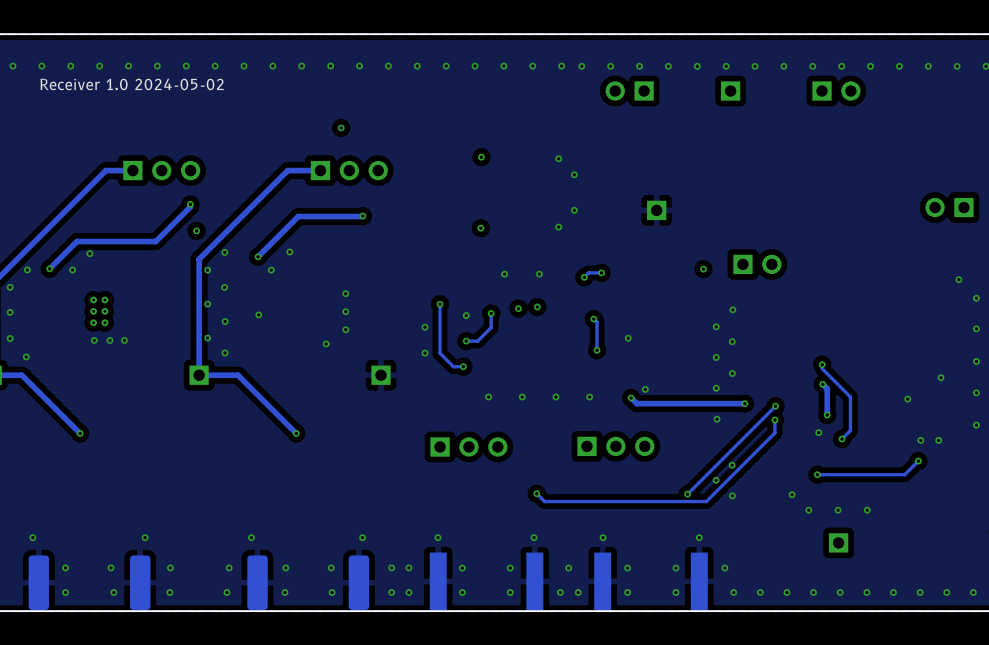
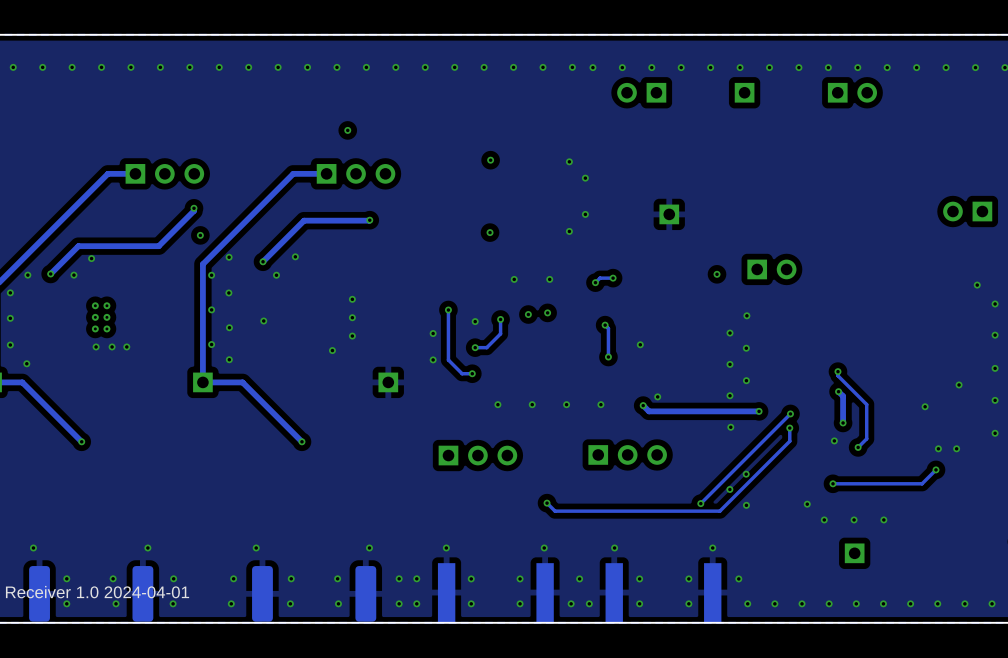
text: Receiver 1.0 2024-05-02 (132, 84) -> none
text: none -> Receiver 1.0 2024-04-01 (97, 592)

